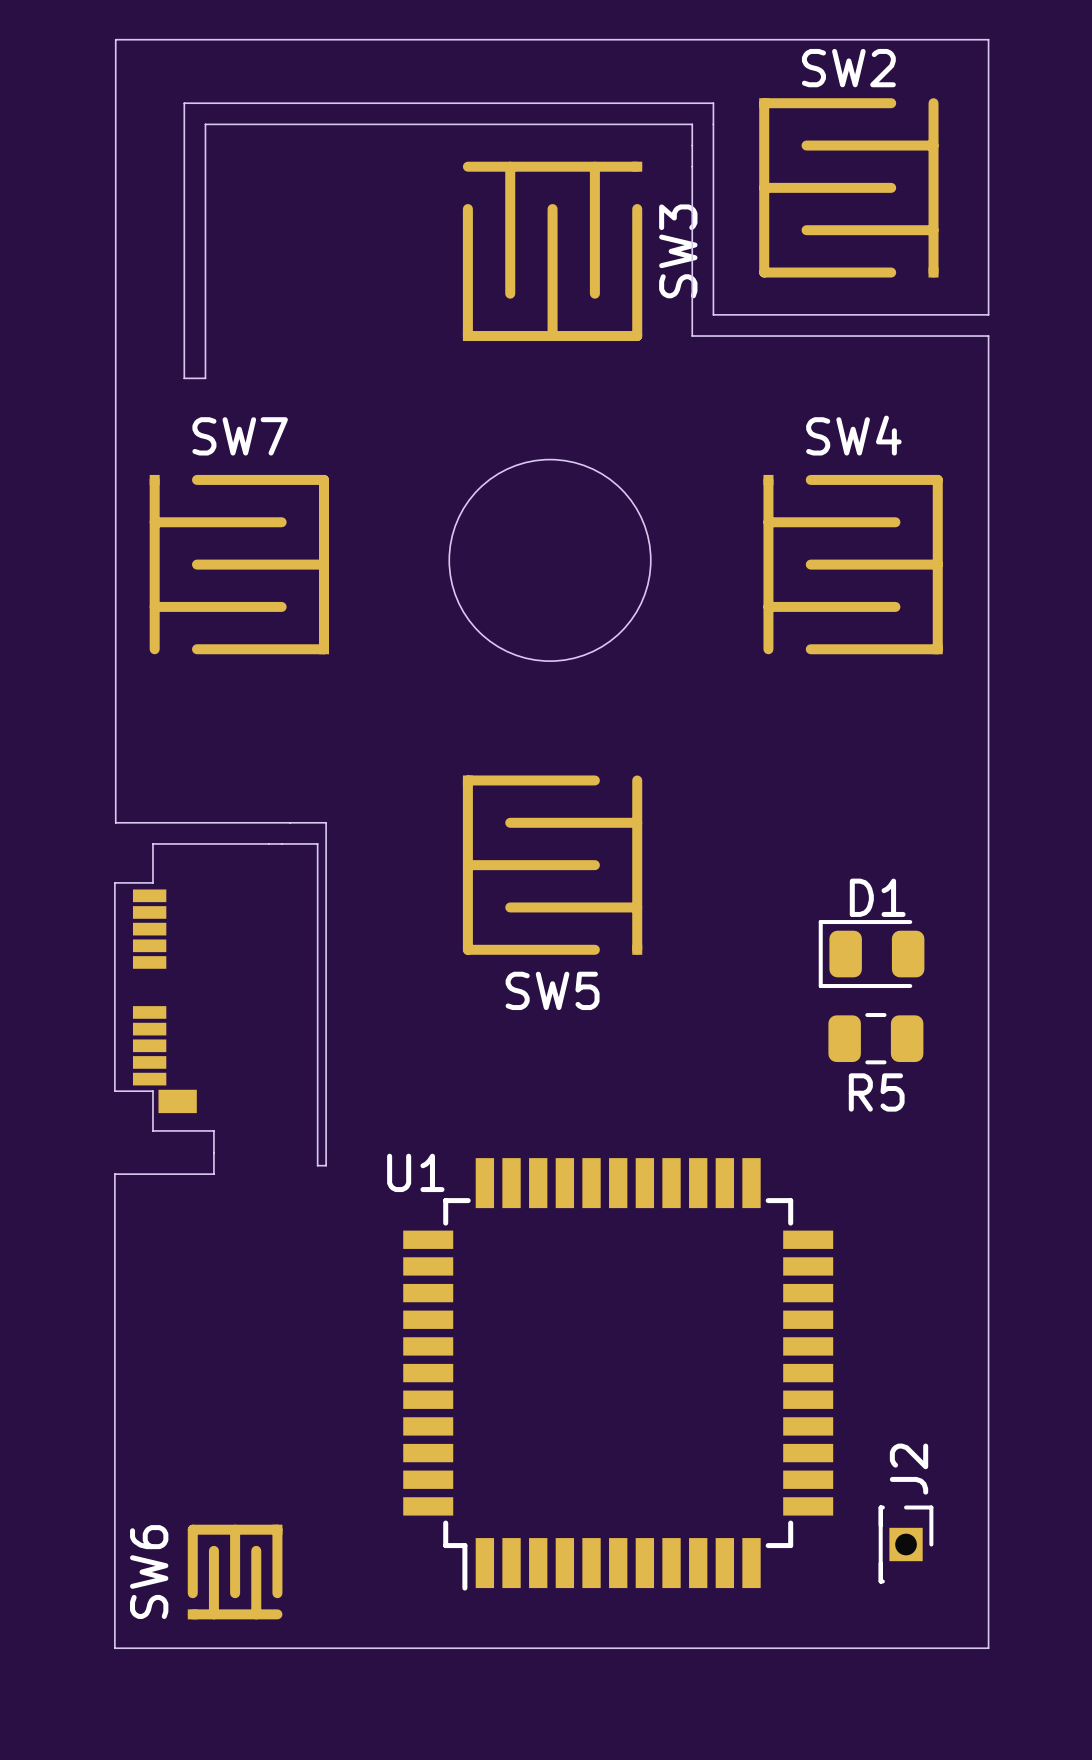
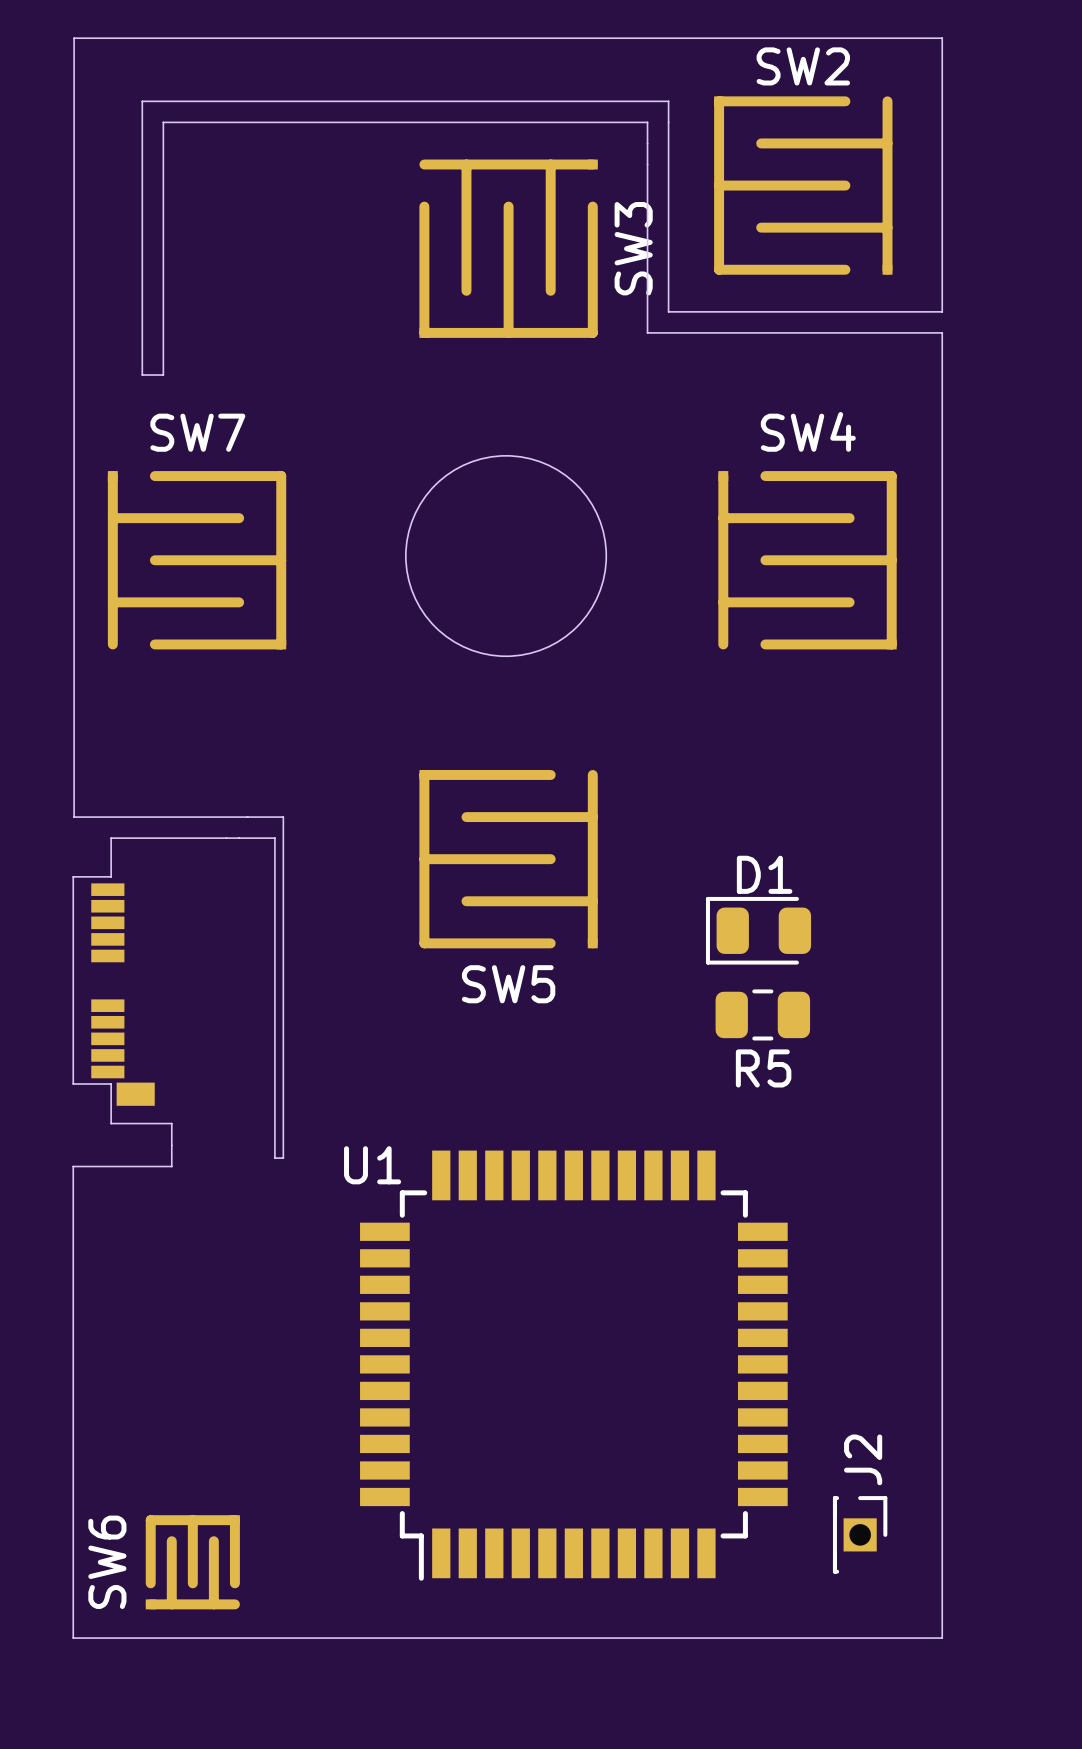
D1 position: (871, 954) -> (758, 930)
R5 position: (875, 1038) -> (762, 1014)

